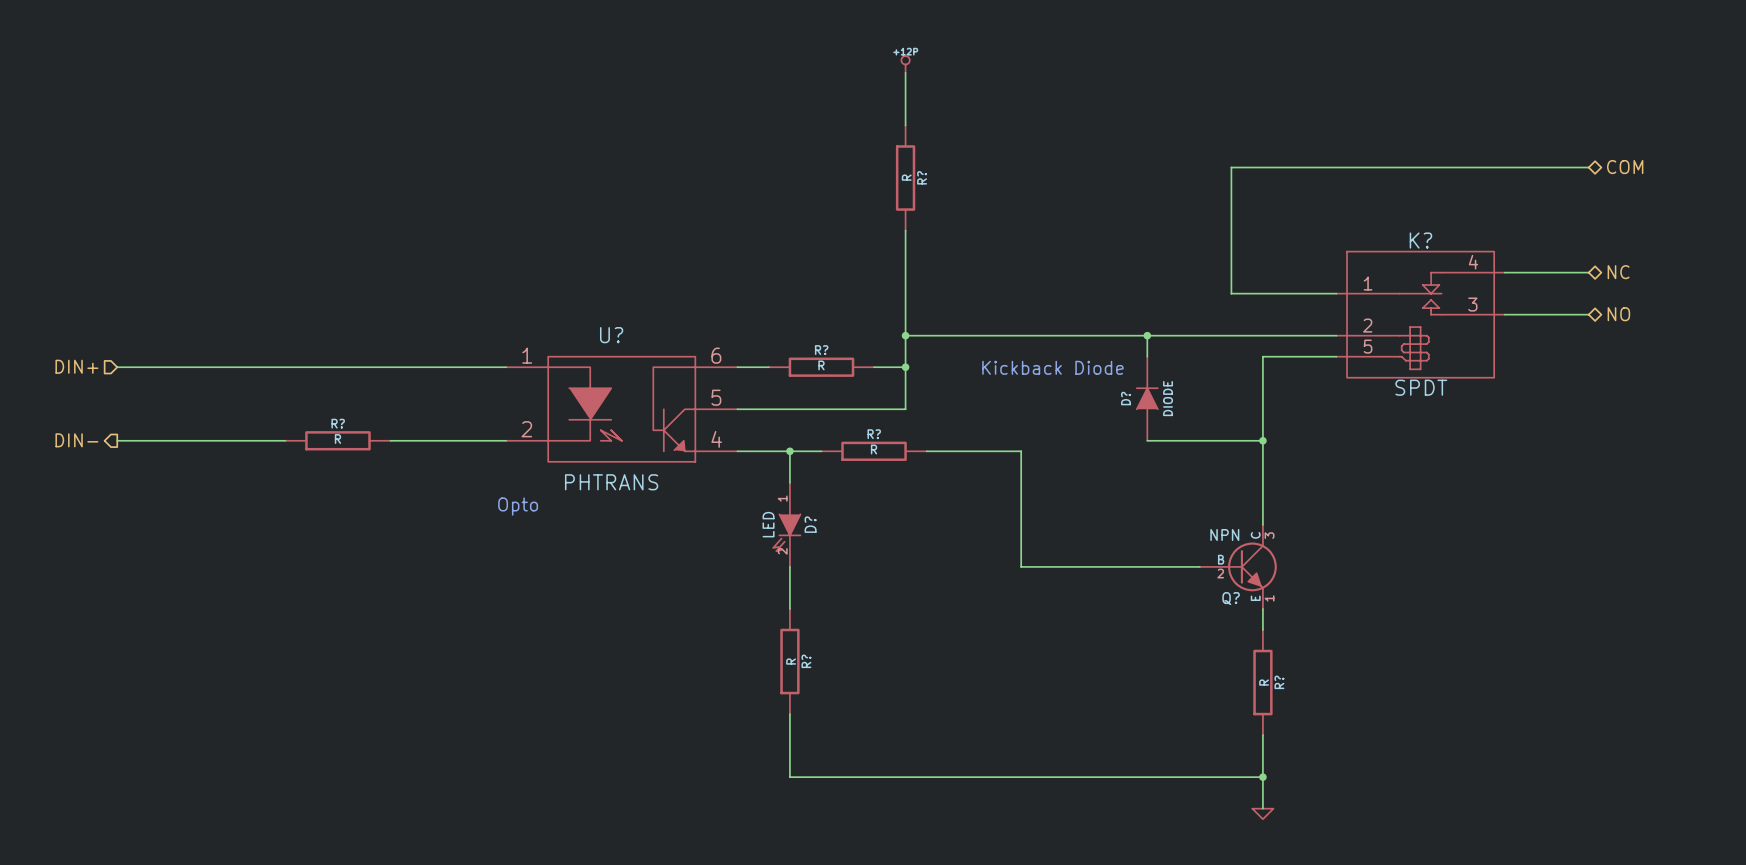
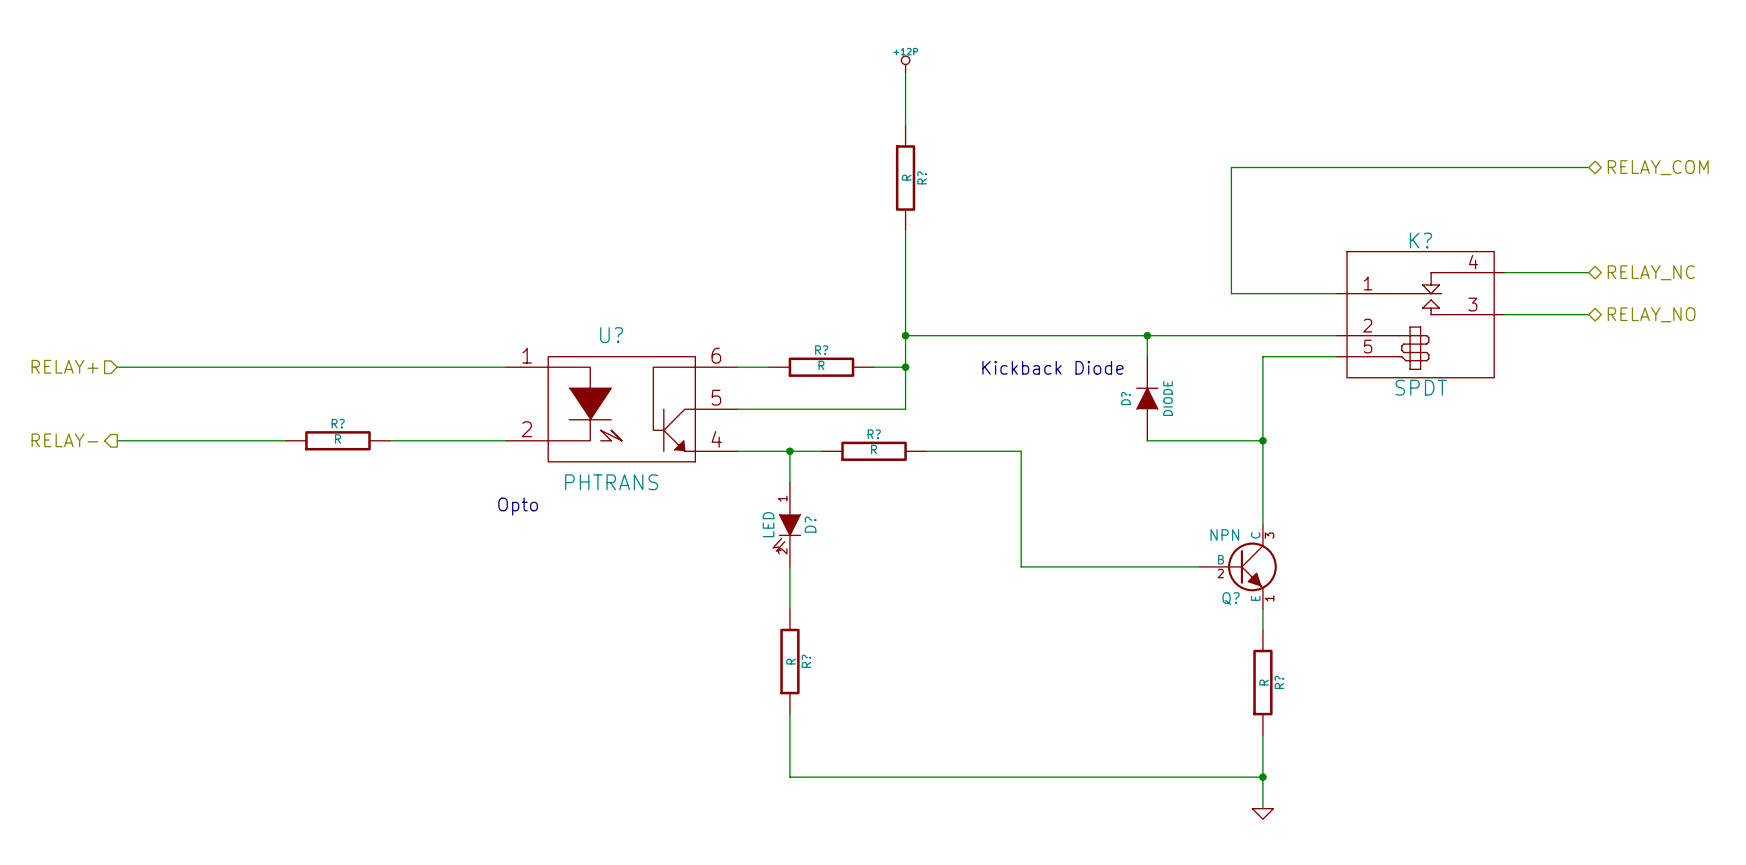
hierarchical label: COM (1625, 167) -> RELAY_COM (1658, 167)
hierarchical label: NC (1618, 272) -> RELAY_NC (1651, 272)
hierarchical label: NO (1618, 314) -> RELAY_NO (1651, 314)
hierarchical label: DIN+ (76, 366) -> RELAY+ (64, 366)
hierarchical label: DIN- (76, 440) -> RELAY- (64, 440)

